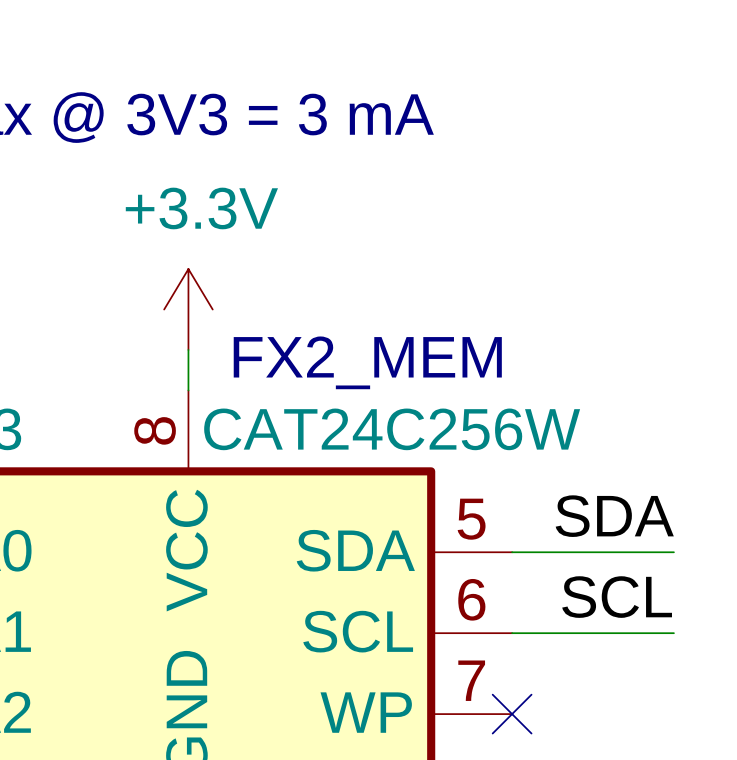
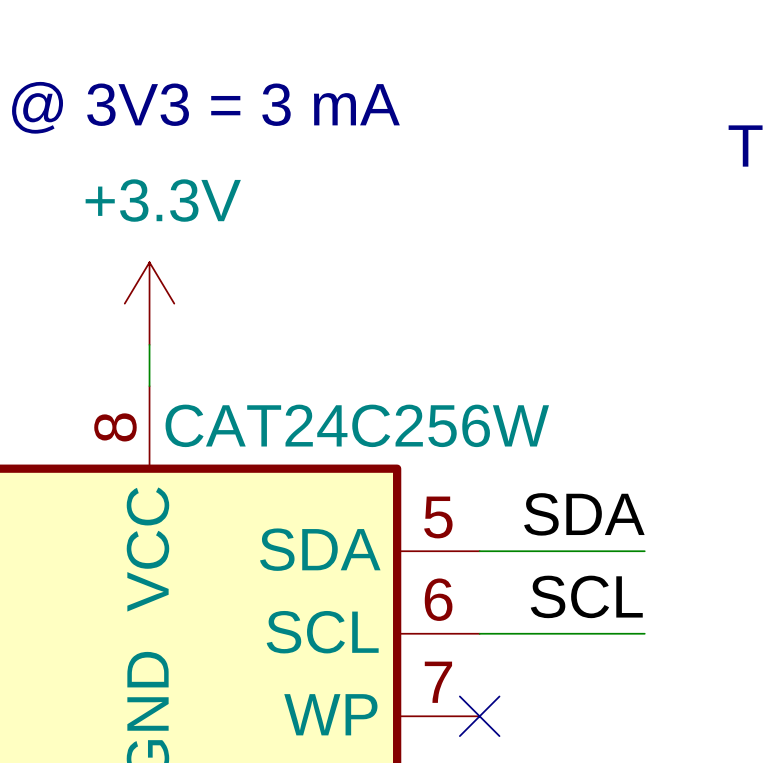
text: FX2_MEM (367, 362) -> none

